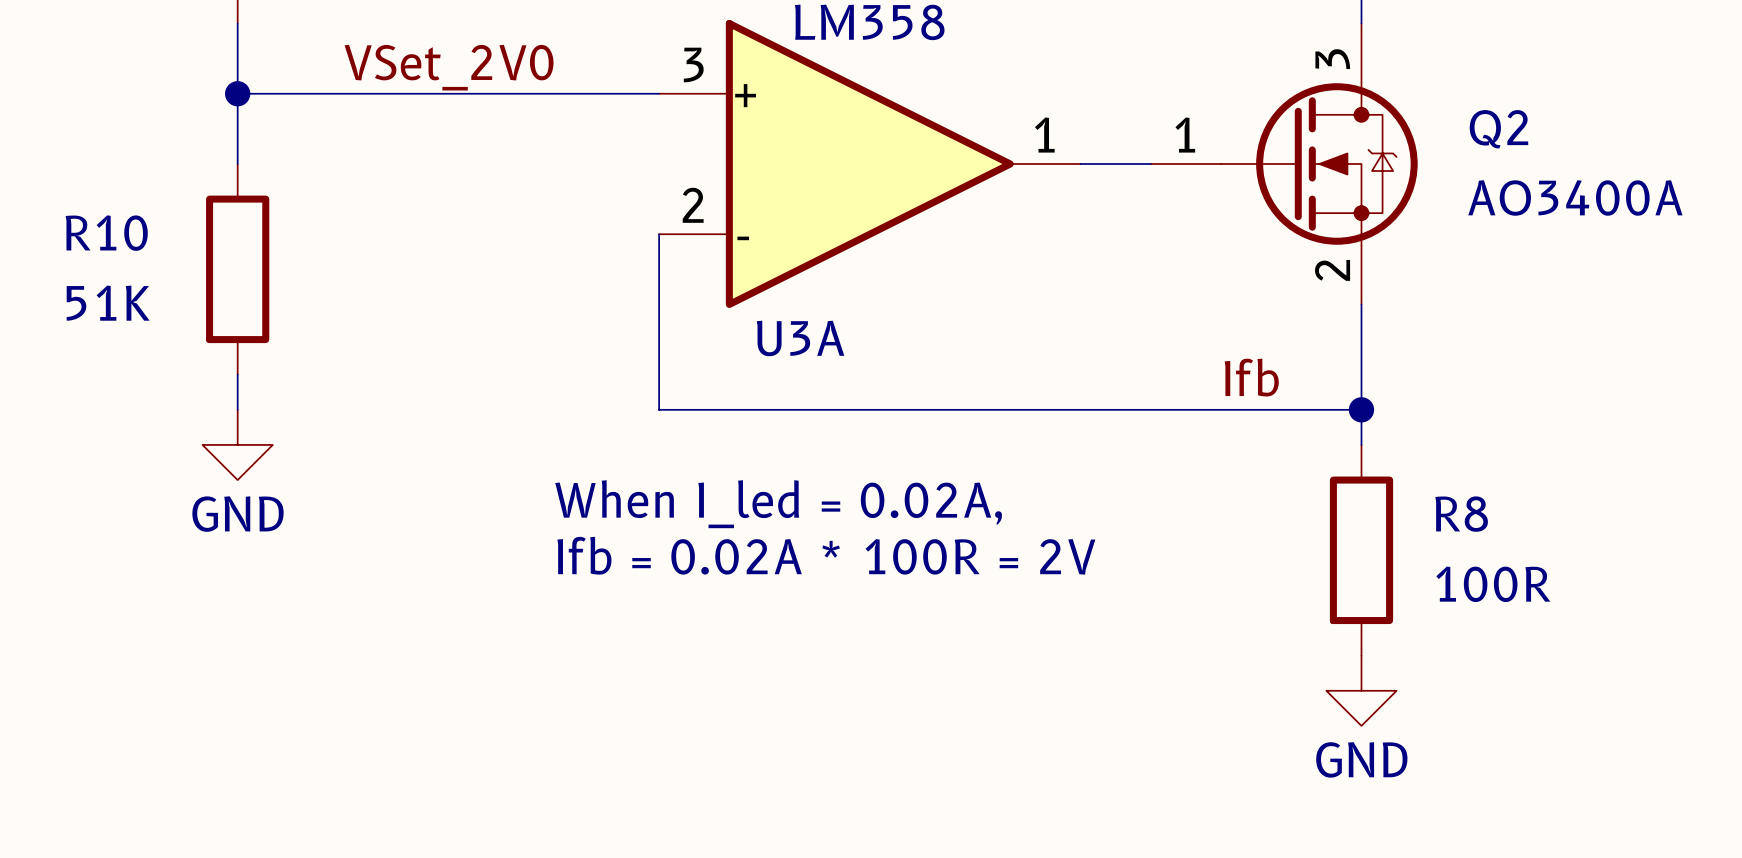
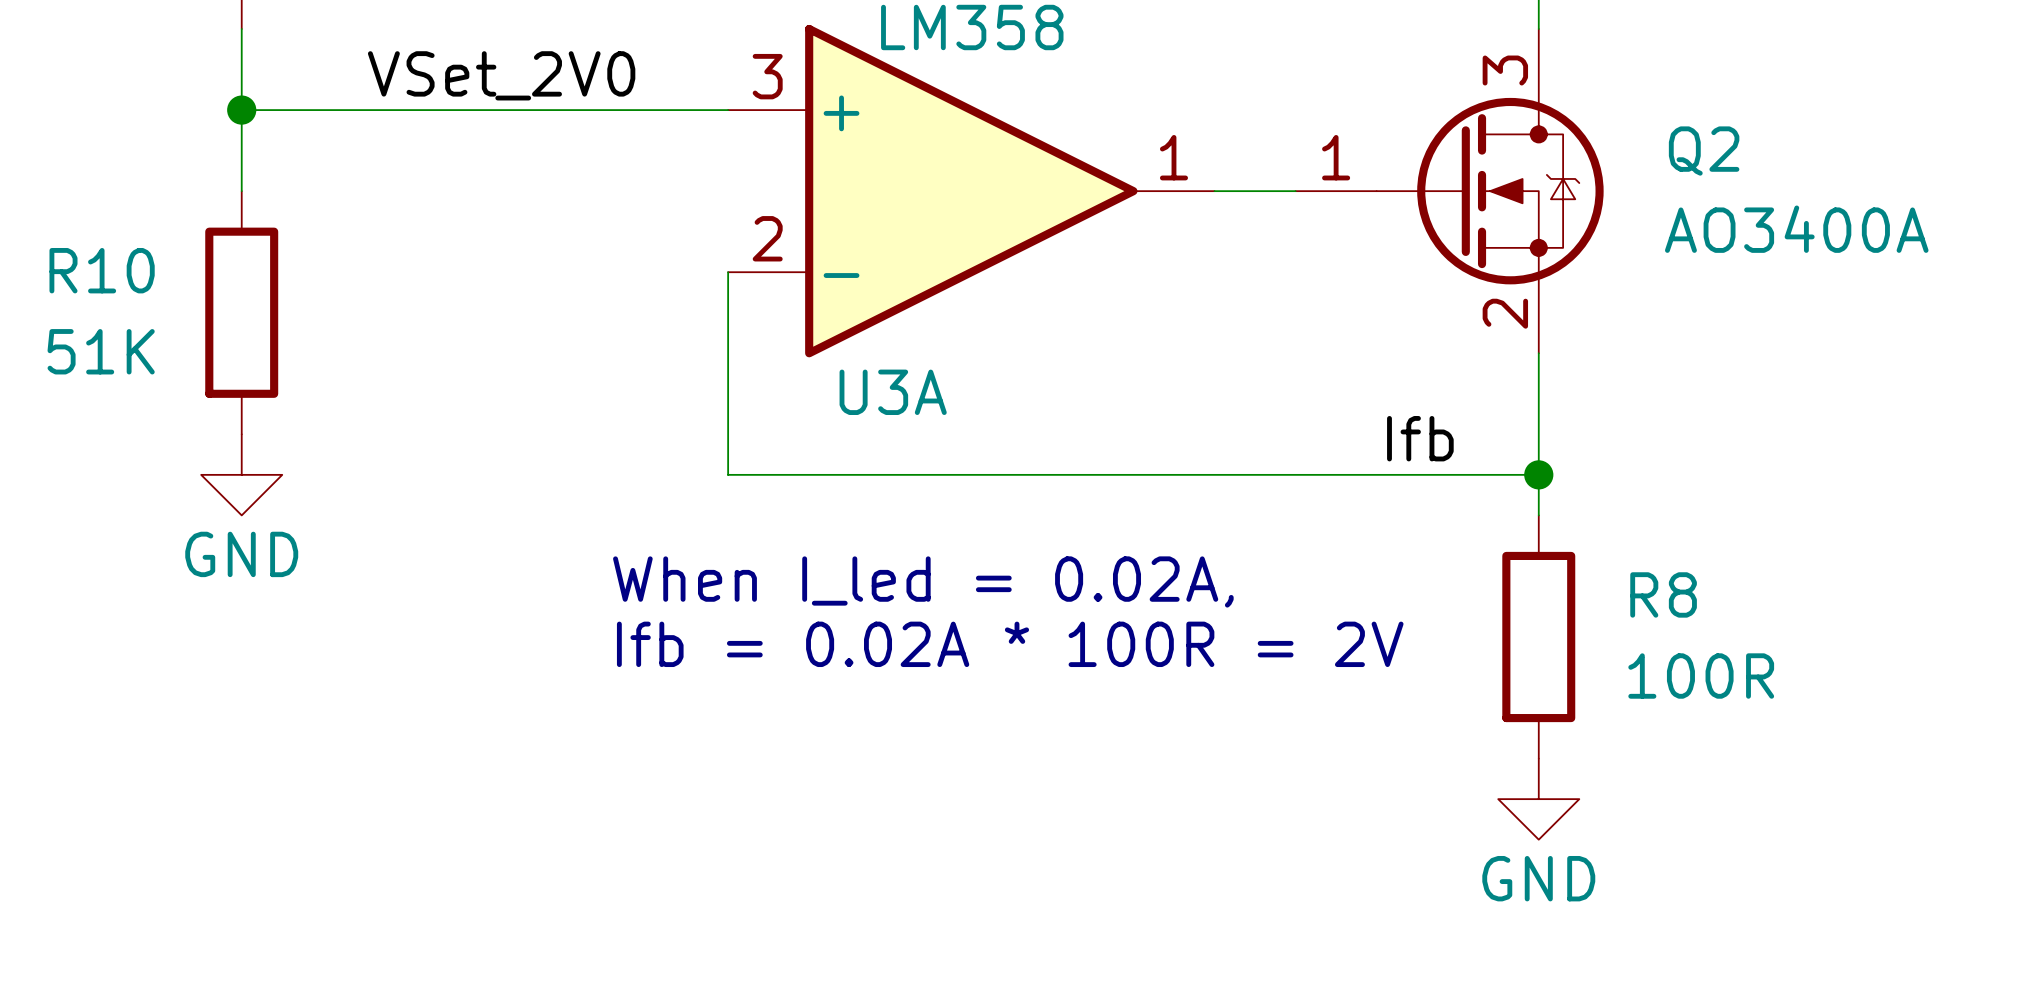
power symbol position: GND (237, 444) -> GND (241, 474)

